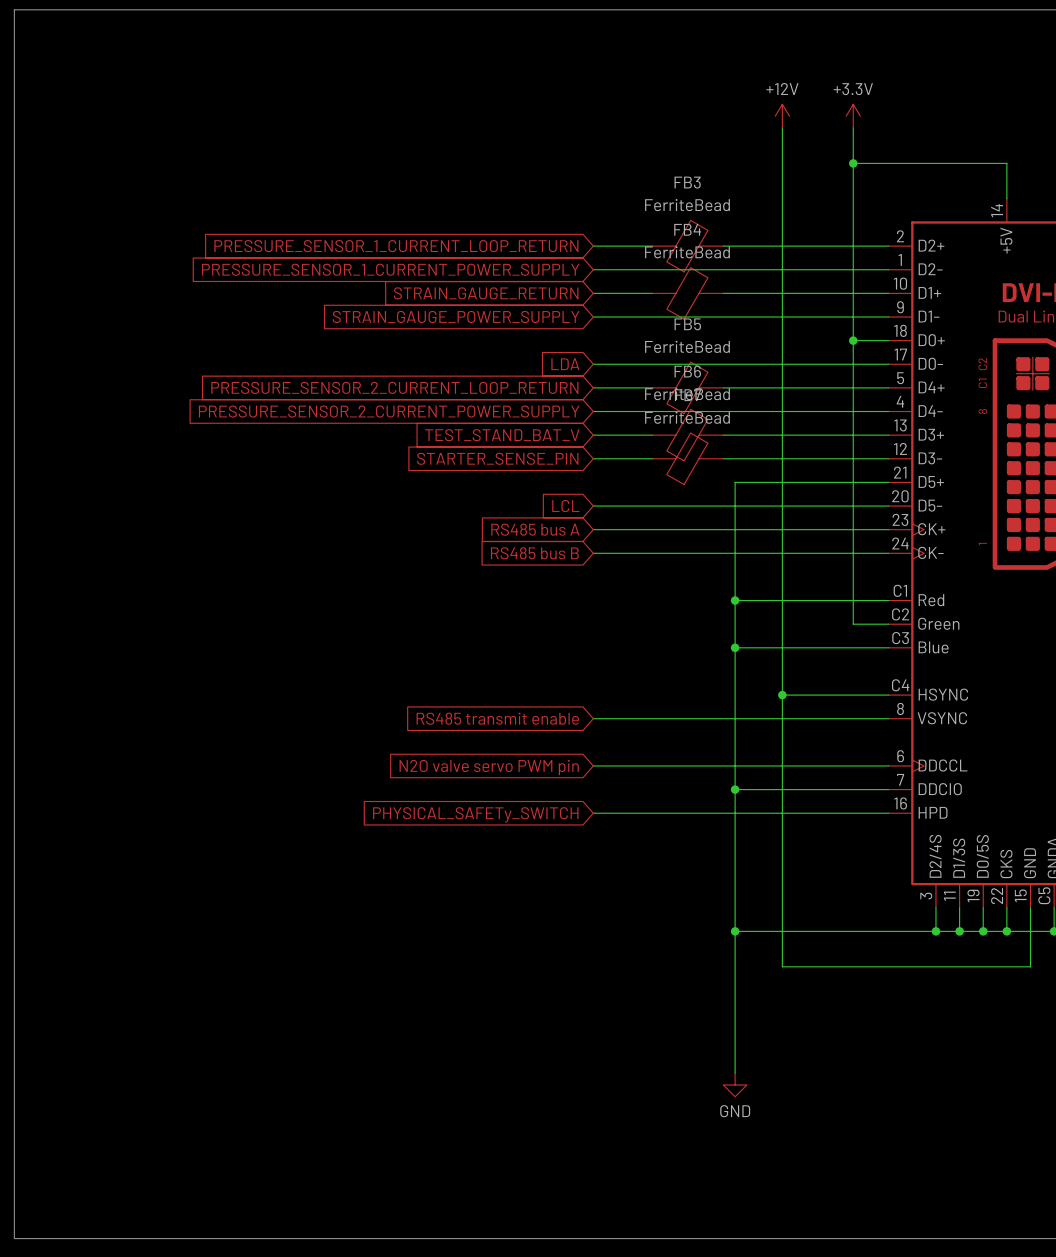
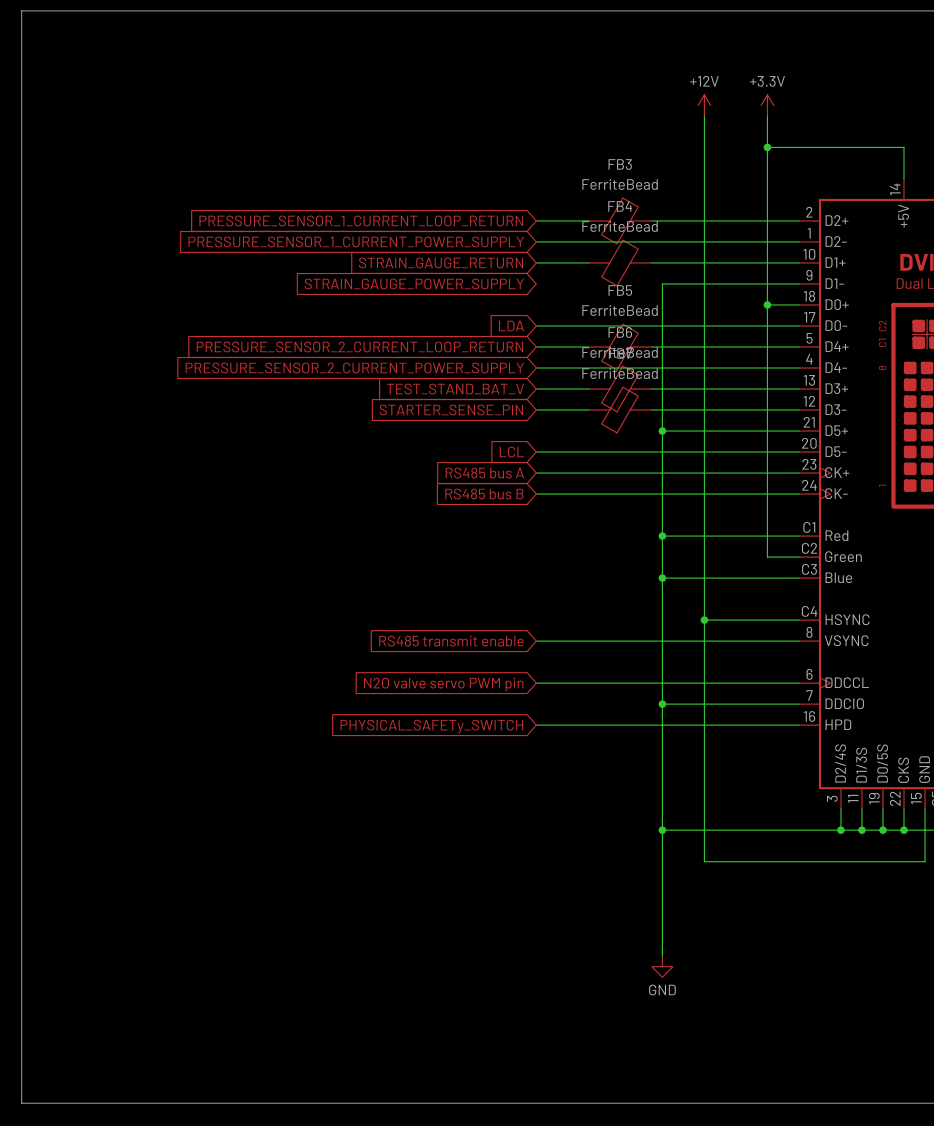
wire: (593, 317) (735, 317) -> (662, 431) (662, 283)
junction: none -> (662, 431)

